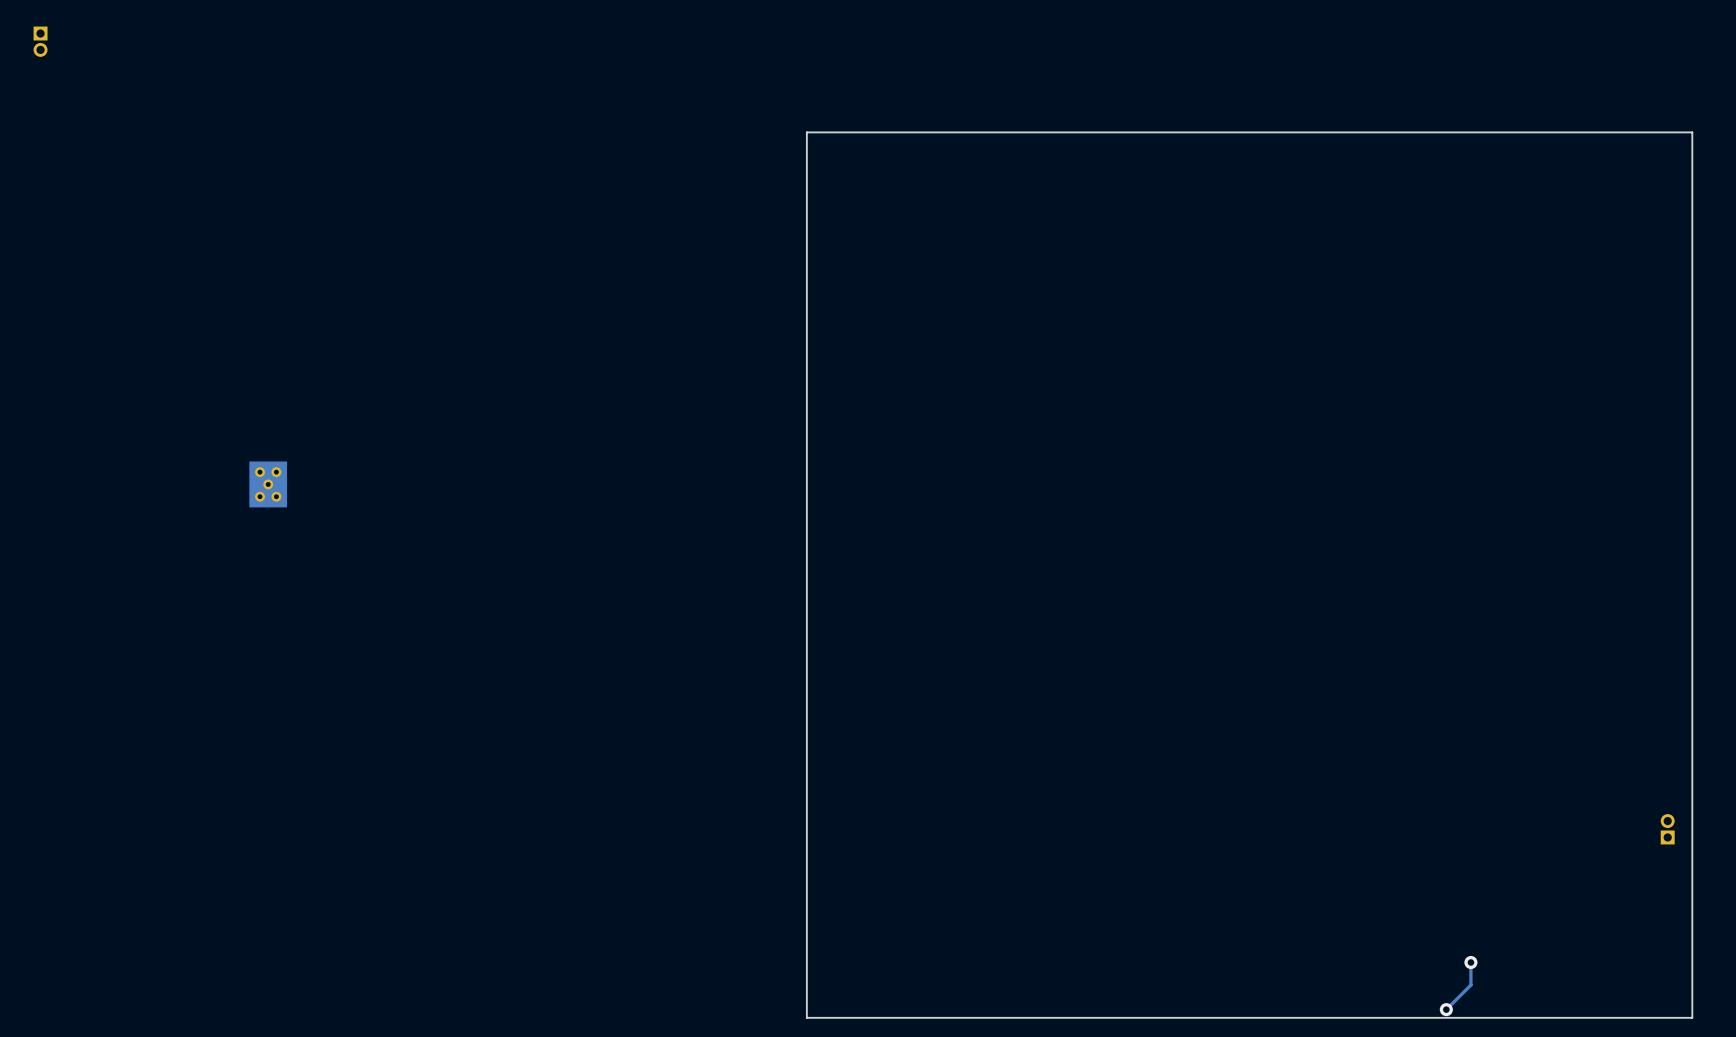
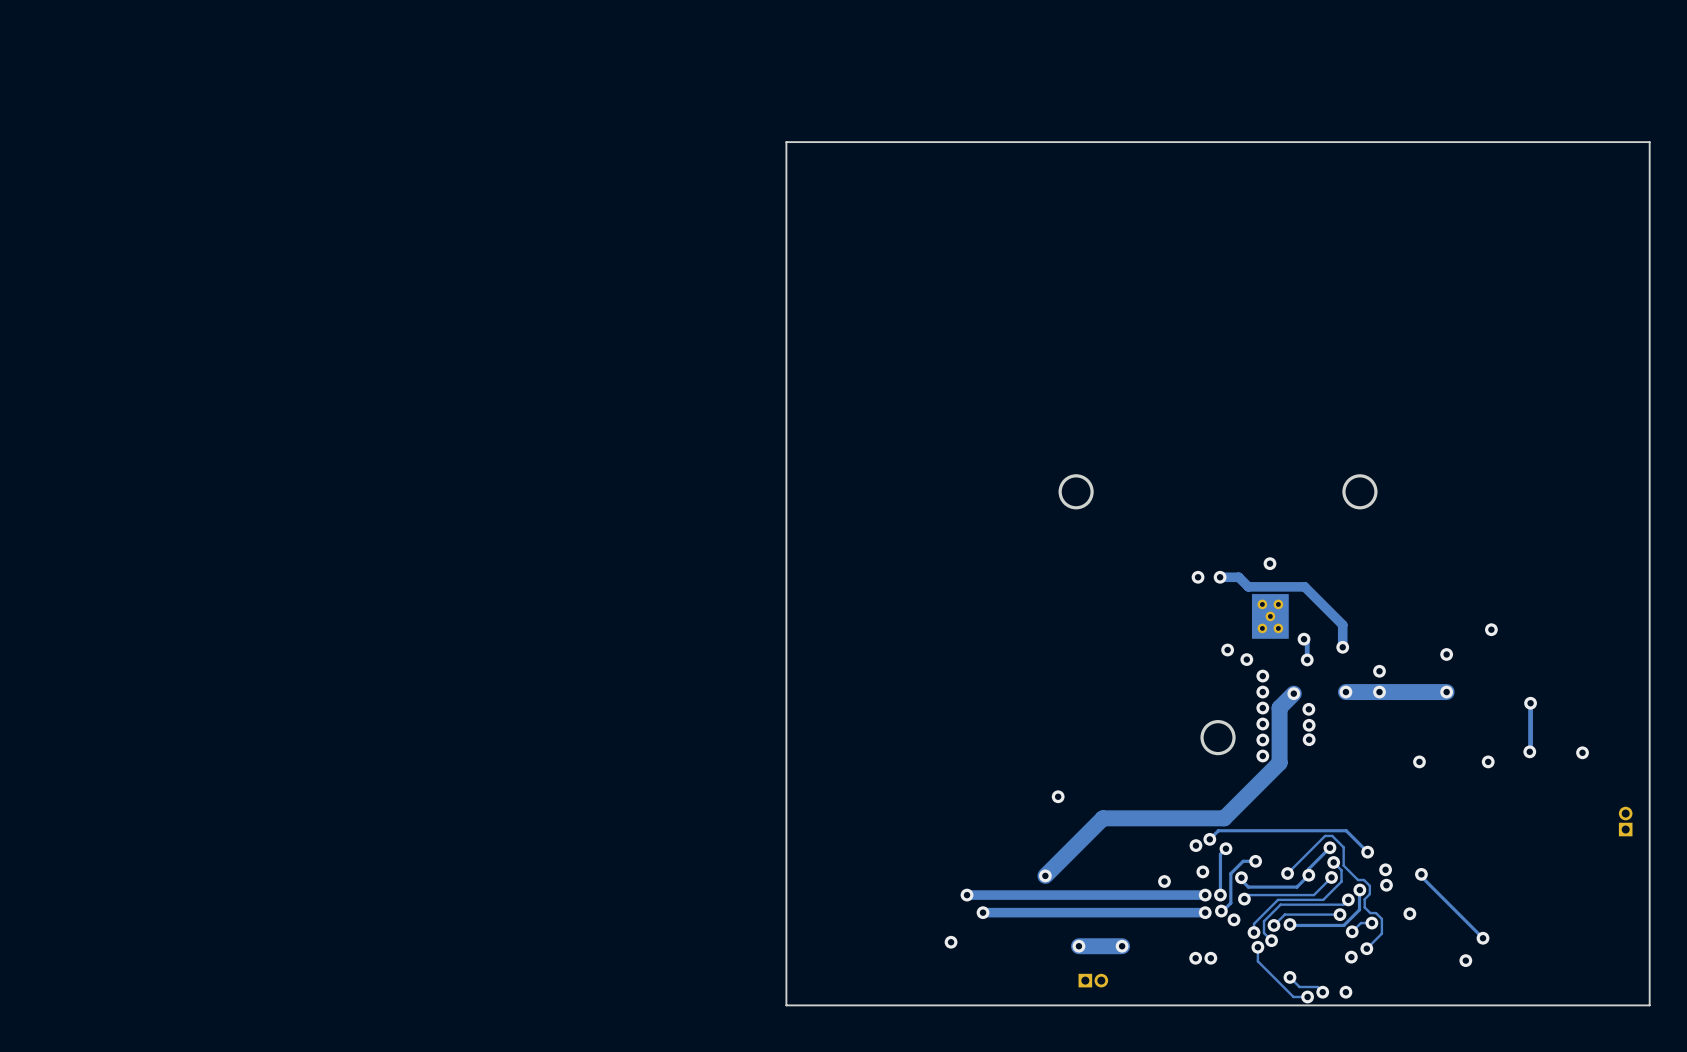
part: (40, 41) -> none
round board edge: none -> [1058, 474, 1094, 510]
round board edge: none -> [1342, 474, 1378, 510]
part: (268, 484) -> none
via: none -> (1269, 563)
via: none -> (1198, 577)
track: none -> (1220, 577) (1238, 577) (1248, 586) (1304, 586) (1342, 624) (1342, 647)
via: none -> (1220, 577)
part: none -> (1270, 616)
via: none -> (1491, 629)
track: none -> (1304, 639) (1307, 642) (1307, 659)
via: none -> (1304, 639)
via: none -> (1342, 647)
via: none -> (1227, 650)
via: none -> (1446, 654)
via: none -> (1246, 659)
via: none -> (1307, 659)
via: none -> (1379, 671)
via: none -> (1262, 676)
via: none -> (1262, 692)
via: none -> (1345, 692)
via: none -> (1379, 692)
track: none -> (1446, 692) (1345, 692)
via: none -> (1446, 692)
track: none -> (1293, 693) (1279, 707) (1279, 762) (1224, 818) (1102, 818) (1045, 875)
via: none -> (1293, 693)
track: none -> (1530, 703) (1529, 751)
via: none -> (1530, 703)
via: none -> (1262, 708)
via: none -> (1308, 709)
round board edge: none -> [1200, 720, 1236, 756]
via: none -> (1262, 724)
via: none -> (1309, 725)
via: none -> (1262, 740)
via: none -> (1309, 739)
via: none -> (1529, 751)
via: none -> (1582, 752)
via: none -> (1262, 755)
via: none -> (1419, 761)
via: none -> (1488, 761)
via: none -> (1058, 796)
track: none -> (1209, 839) (1218, 830) (1346, 830) (1367, 852)
via: none -> (1209, 839)
via: none -> (1195, 845)
track: none -> (1329, 847) (1308, 868) (1308, 875) (1296, 887) (1248, 887) (1241, 877)
via: none -> (1329, 847)
track: none -> (1225, 848) (1220, 854) (1220, 895)
via: none -> (1225, 848)
via: none -> (1367, 852)
track: none -> (1255, 861) (1243, 861) (1230, 873) (1230, 903) (1221, 911)
via: none -> (1255, 861)
track: none -> (1333, 862) (1341, 870) (1341, 881) (1323, 899) (1277, 899) (1254, 923) (1254, 932)
via: none -> (1333, 862)
via: none -> (1385, 869)
via: none -> (1202, 871)
track: none -> (1287, 873) (1325, 835) (1332, 835) (1343, 847) (1343, 865) (1358, 880) (1363, 880) (1369, 885) (1369, 894) (1364, 899) (1364, 907) (1370, 913) (1376, 913) (1381, 918) (1381, 933) (1366, 948)
via: none -> (1287, 873)
track: none -> (1421, 874) (1421, 876) (1483, 938)
via: none -> (1421, 874)
via: none -> (1308, 875)
via: none -> (1045, 875)
via: none -> (1241, 877)
track: none -> (1331, 877) (1313, 895) (1248, 895) (1244, 899)
via: none -> (1331, 877)
via: none -> (1164, 881)
via: none -> (1386, 885)
track: none -> (1359, 889) (1359, 909) (1343, 925) (1289, 924)
via: none -> (1359, 889)
via: none -> (967, 895)
track: none -> (1205, 895) (965, 895)
via: none -> (1205, 895)
via: none -> (1220, 895)
via: none -> (1244, 899)
track: none -> (1348, 899) (1343, 904) (1280, 904) (1263, 921) (1263, 933) (1271, 940)
via: none -> (1348, 899)
via: none -> (1221, 911)
via: none -> (983, 912)
track: none -> (1205, 912) (983, 912)
via: none -> (1205, 912)
via: none -> (1409, 913)
track: none -> (1339, 914) (1284, 914) (1273, 925)
via: none -> (1340, 914)
via: none -> (1234, 919)
track: none -> (1371, 923) (1360, 923) (1352, 931)
via: none -> (1371, 923)
via: none -> (1289, 924)
via: none -> (1273, 925)
via: none -> (1352, 931)
via: none -> (1254, 932)
via: none -> (1483, 938)
via: none -> (1271, 940)
via: none -> (951, 942)
via: none -> (1078, 946)
track: none -> (1122, 946) (1078, 946)
via: none -> (1122, 946)
track: none -> (1257, 947) (1257, 961) (1293, 996) (1307, 996)
via: none -> (1257, 947)
via: none -> (1366, 948)
track: (1470, 962) (1470, 985) (1446, 1009) -> none
via: (1470, 962) -> none
via: none -> (1351, 957)
via: none -> (1195, 958)
via: none -> (1210, 958)
via: none -> (1465, 960)
track: none -> (1289, 977) (1299, 987) (1317, 987) (1322, 992)
via: none -> (1289, 977)
part: none -> (1093, 980)
via: none -> (1322, 992)
via: none -> (1345, 992)
via: none -> (1307, 996)
via: (1446, 1009) -> none

